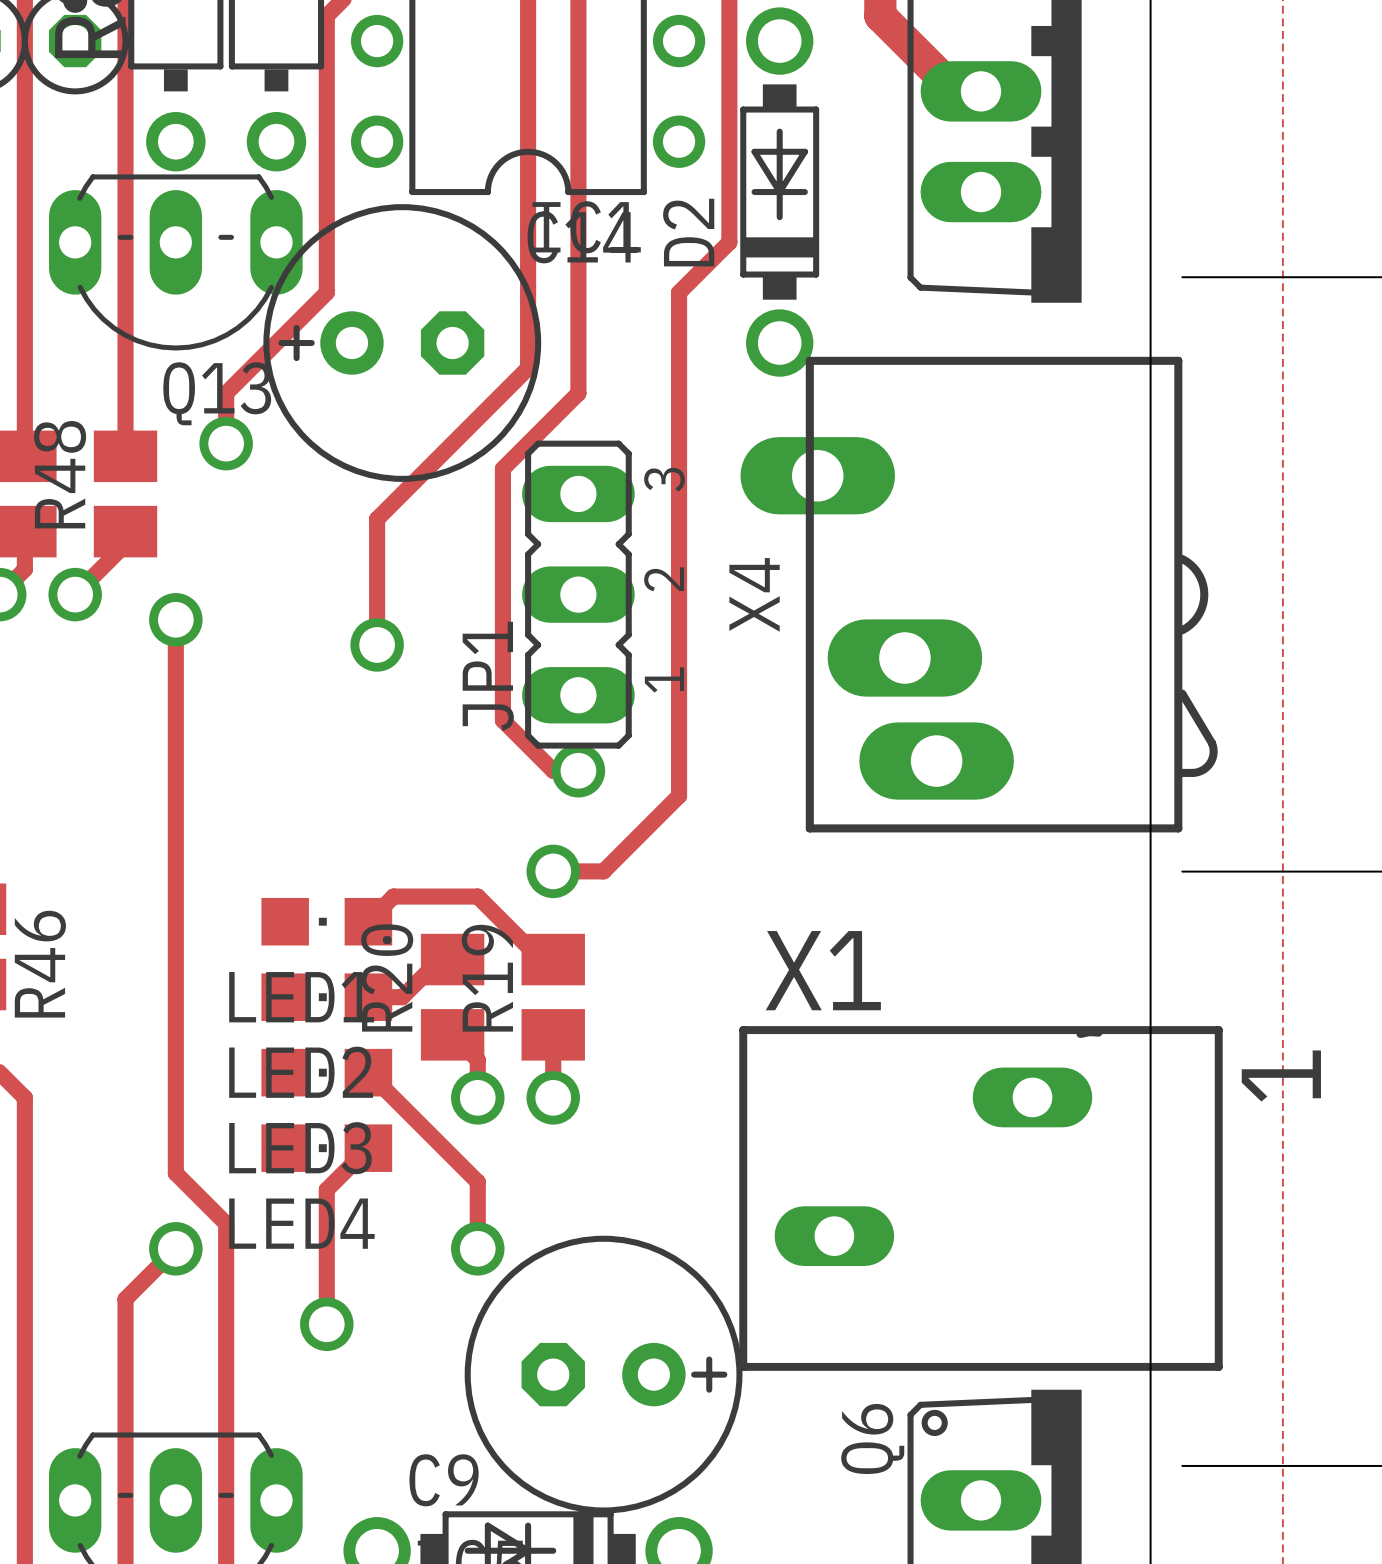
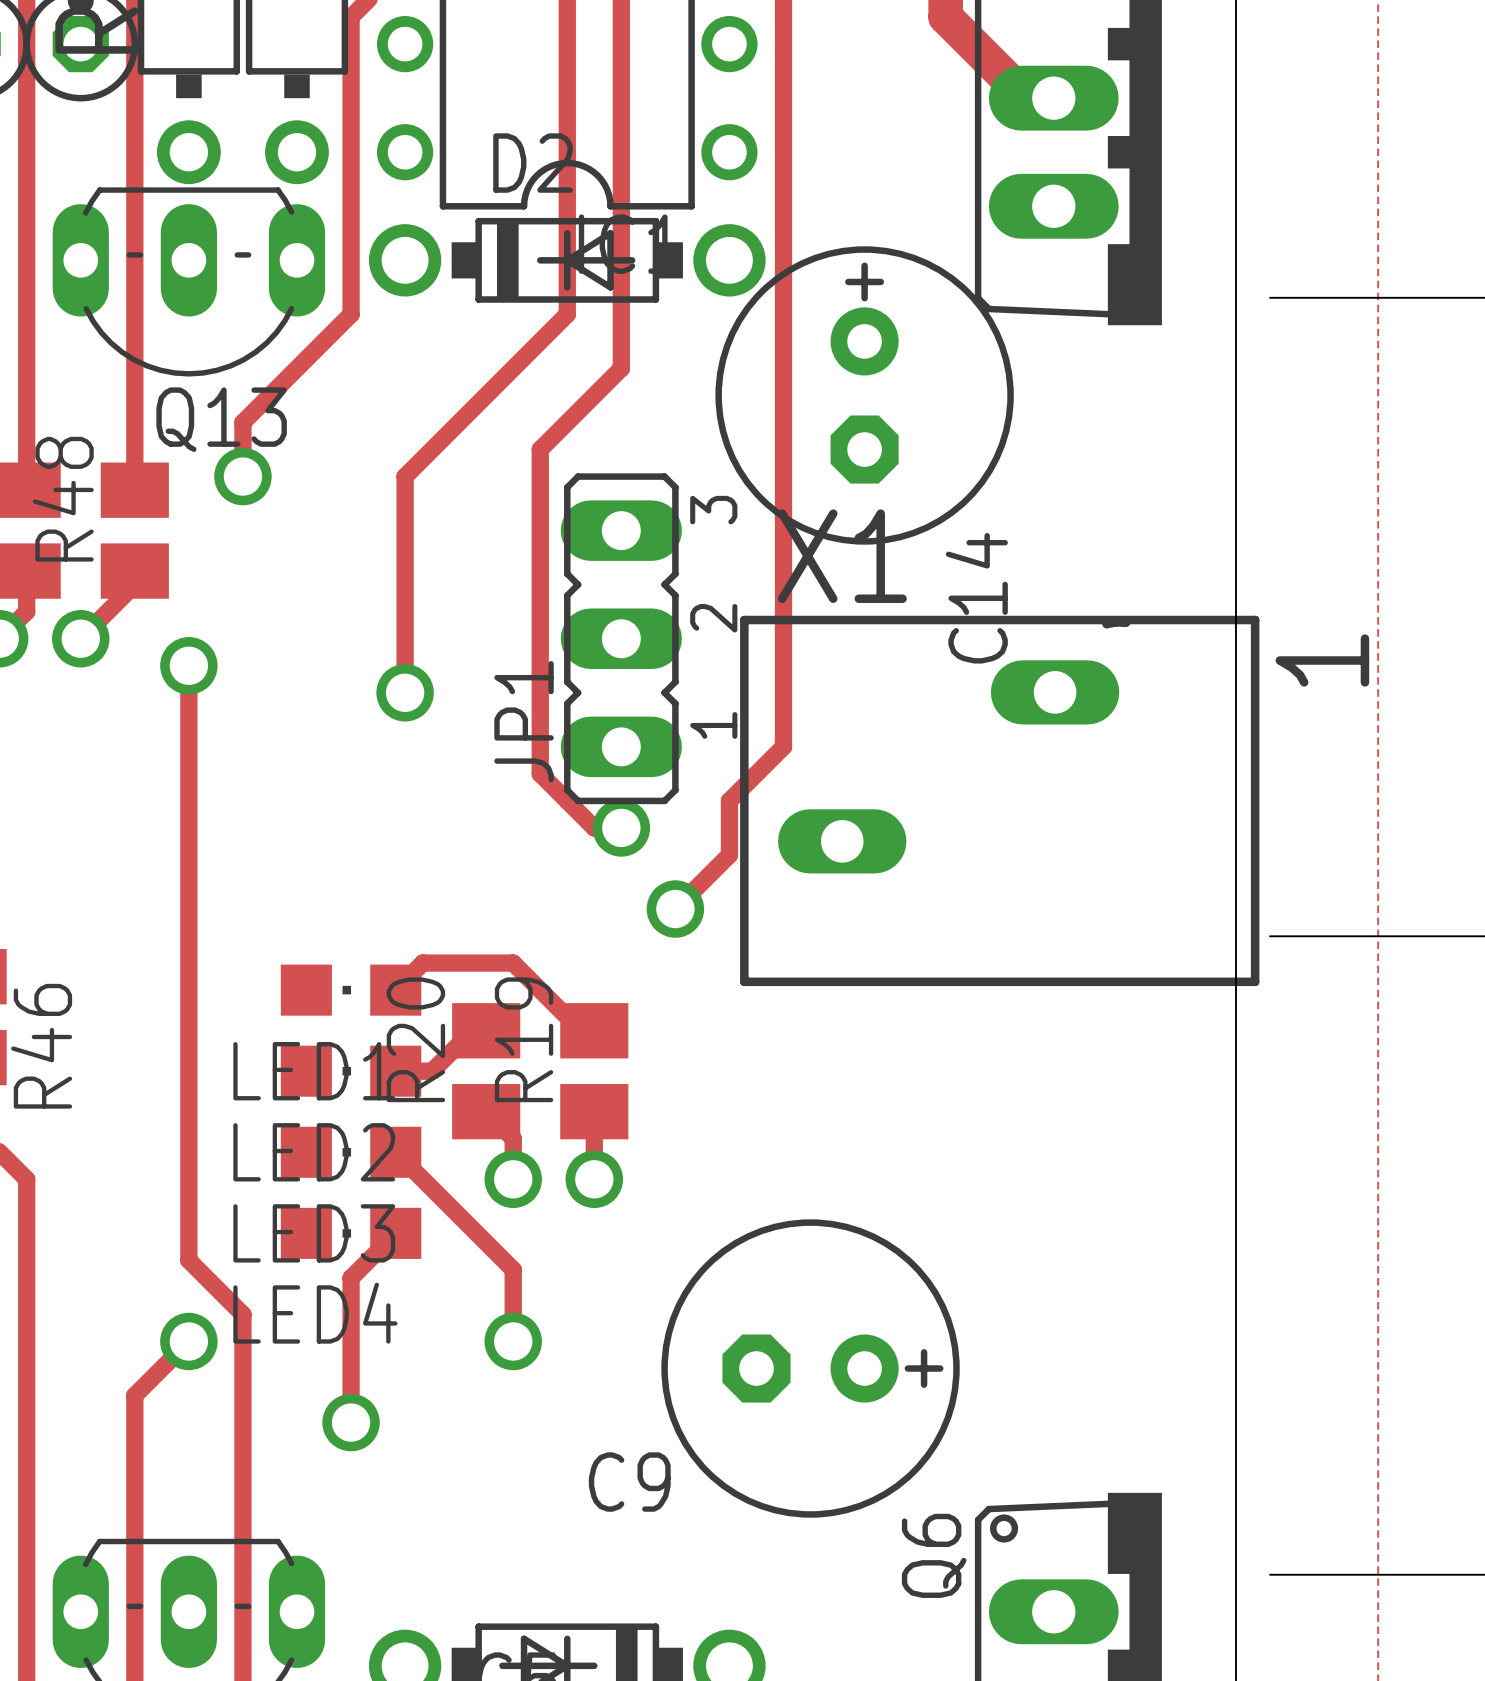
D2 rotation: 0° (779, 192) -> 90° clockwise (567, 260)
D2 position: (779, 192) -> (567, 260)
track: (729, 242) (679, 292) (679, 745) -> (783, 260) (783, 746) (729, 800)
track: (528, 292) (528, 368) (377, 519) -> (567, 314) (405, 476) (405, 557)
C14 rotation: 0° (402, 343) -> 90° clockwise (864, 395)
C14 position: (402, 343) -> (864, 395)
track: (578, 343) (578, 393) (502, 468) -> (621, 368) (540, 449) (540, 503)
X4: (979, 594) -> none
track: (628, 846) (603, 871) (553, 871) -> none
via position: (553, 871) -> (675, 909)
X1 position: (980, 1198) -> (999, 800)
C9 position: (603, 1374) -> (810, 1368)

